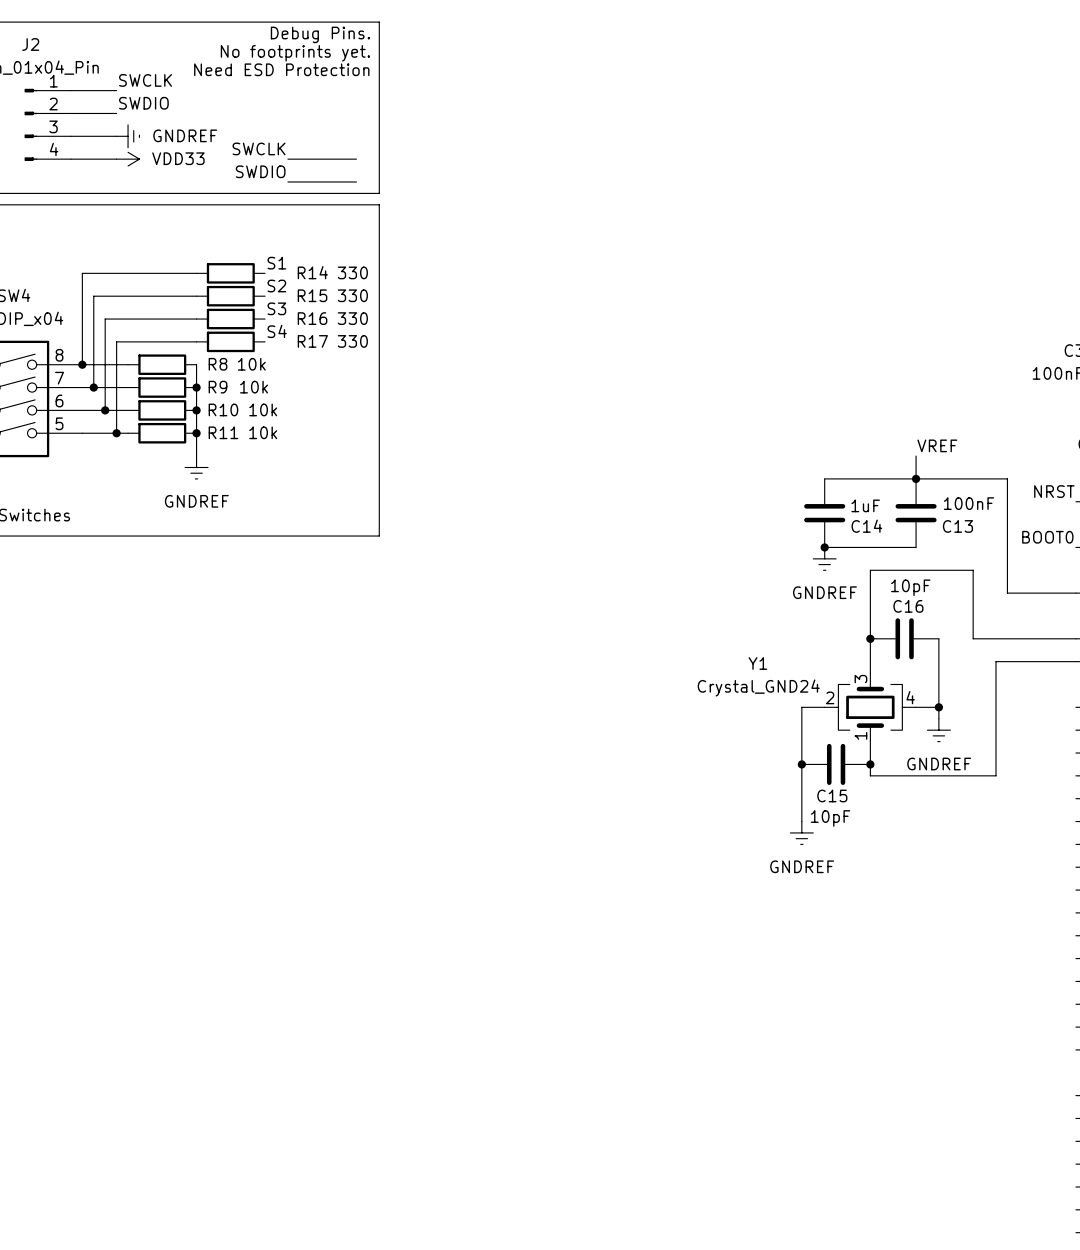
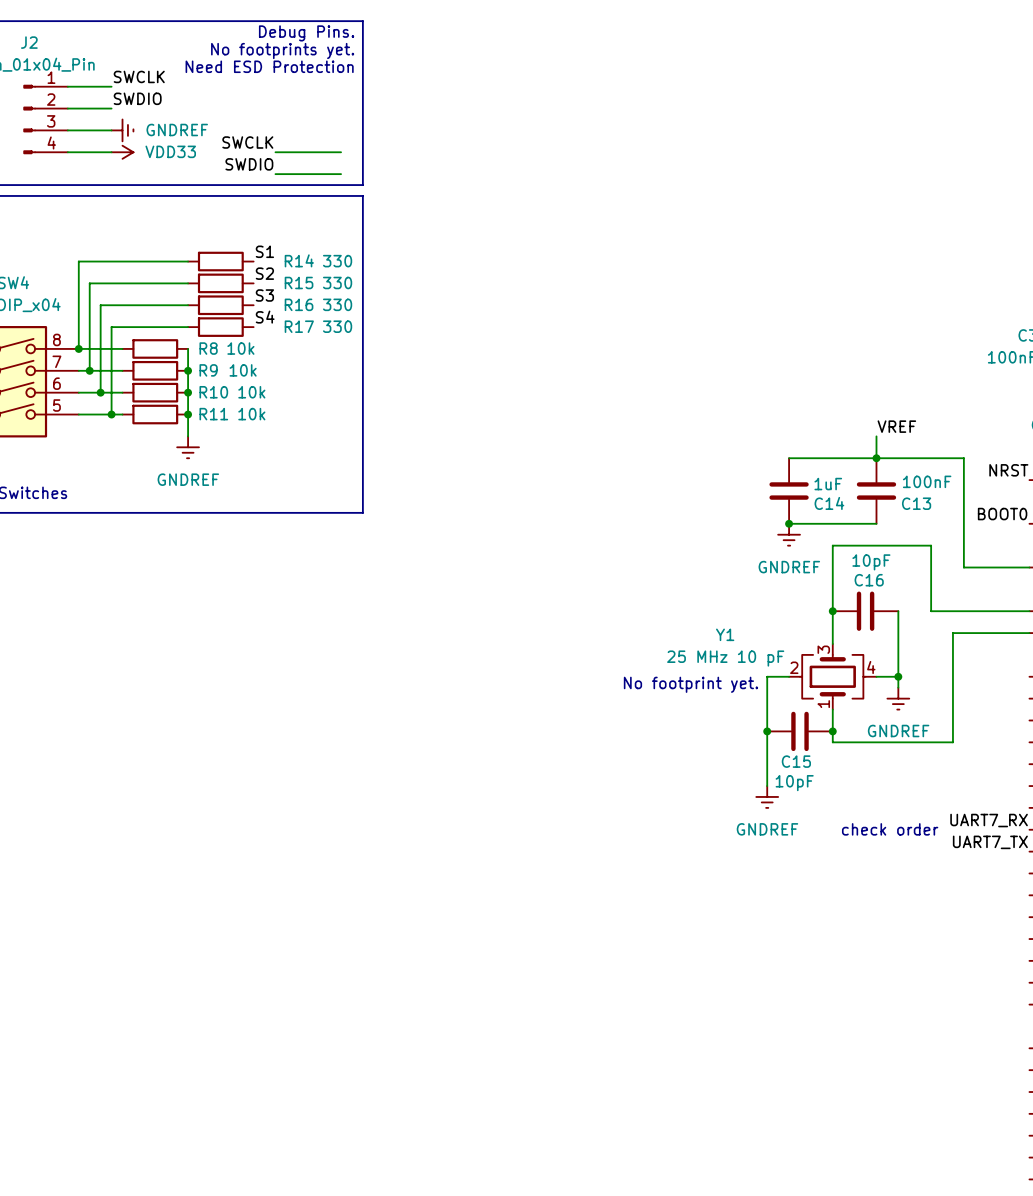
Y1 value: Crystal_GND24 (758, 687) -> 25 MHz 10 pF (725, 658)
text: none -> No footprint yet. (690, 684)
label: none -> UART7_RX (989, 820)
text: none -> check order (890, 829)
label: none -> UART7_TX (990, 842)

